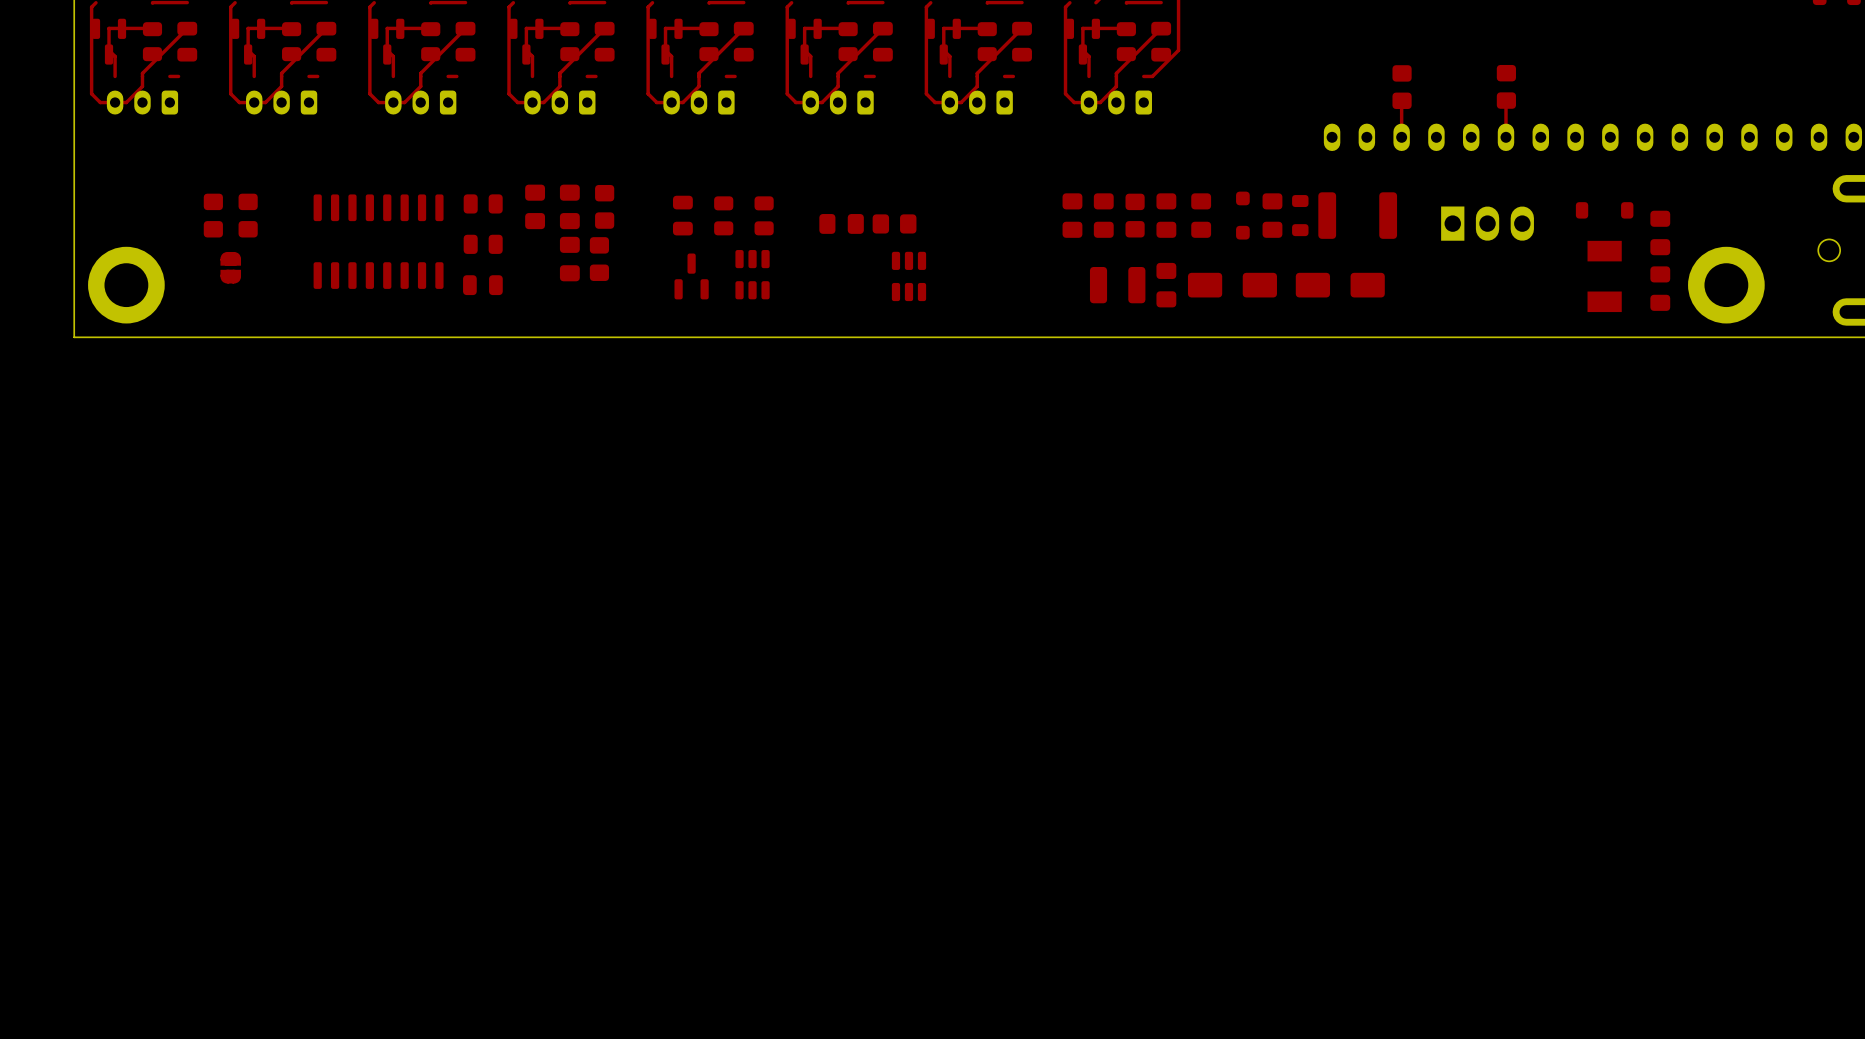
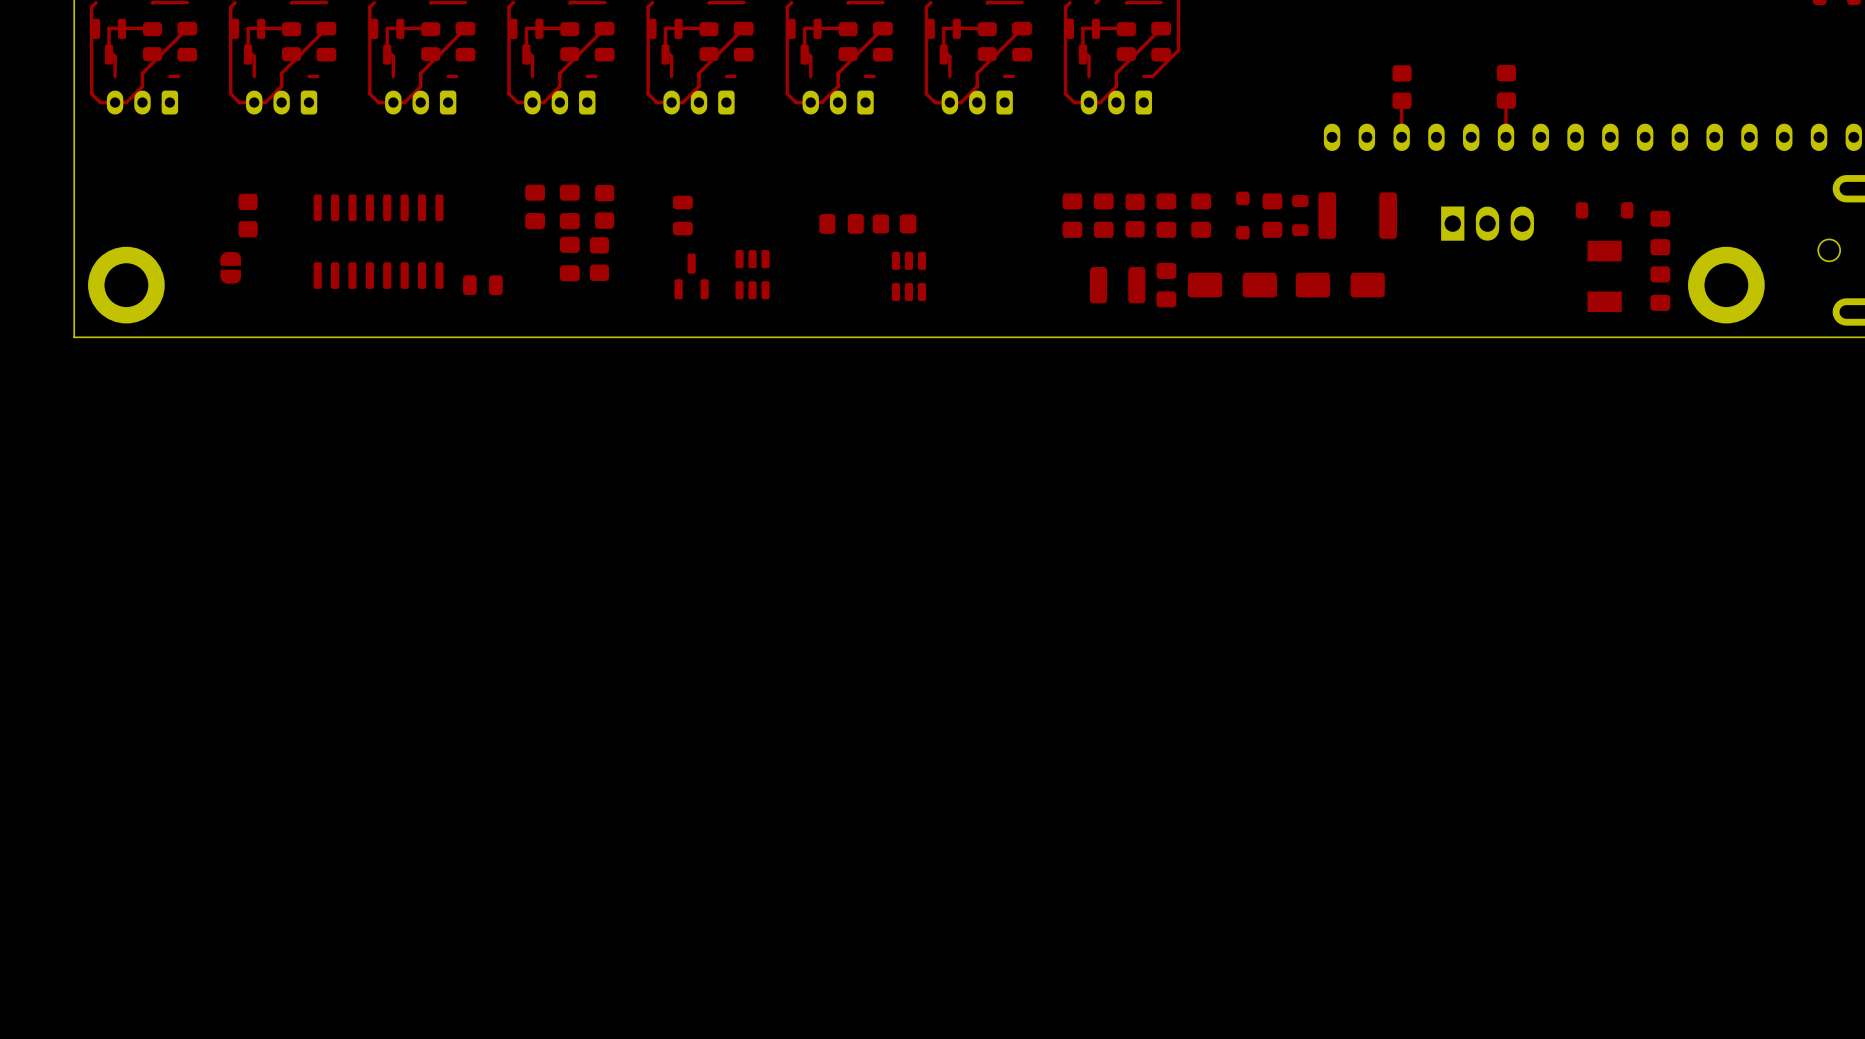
part: (483, 203) -> none
part: (213, 215) -> none
part: (723, 215) -> none
part: (764, 215) -> none
part: (483, 244) -> none

